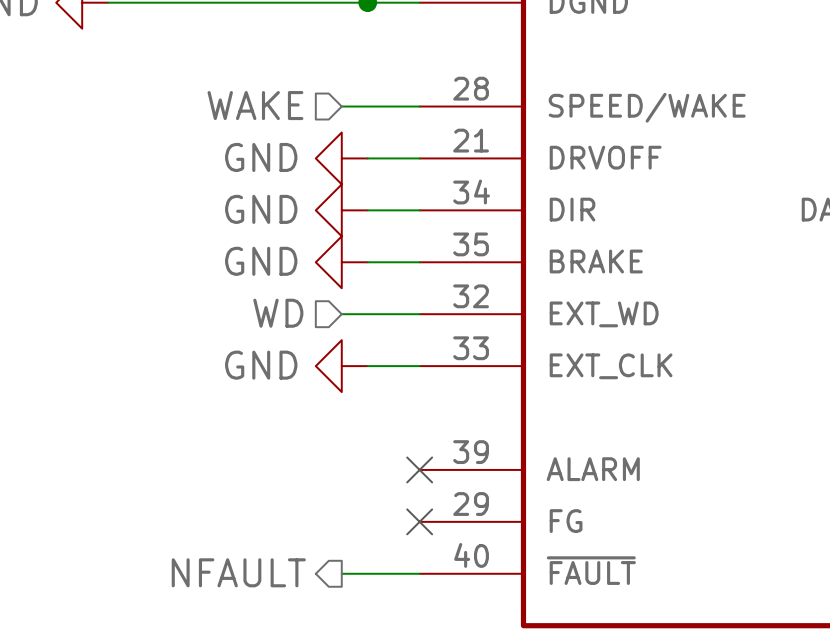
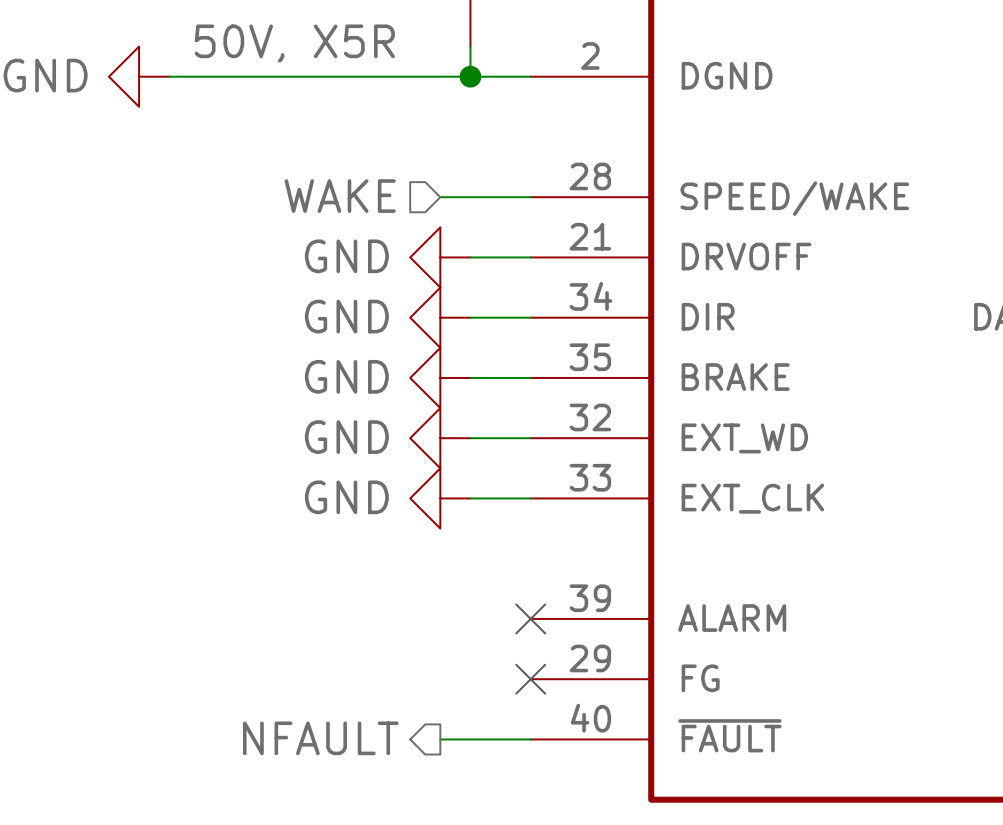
hierarchical label: WD (278, 313) -> none
power symbol: none -> GND (440, 438)

